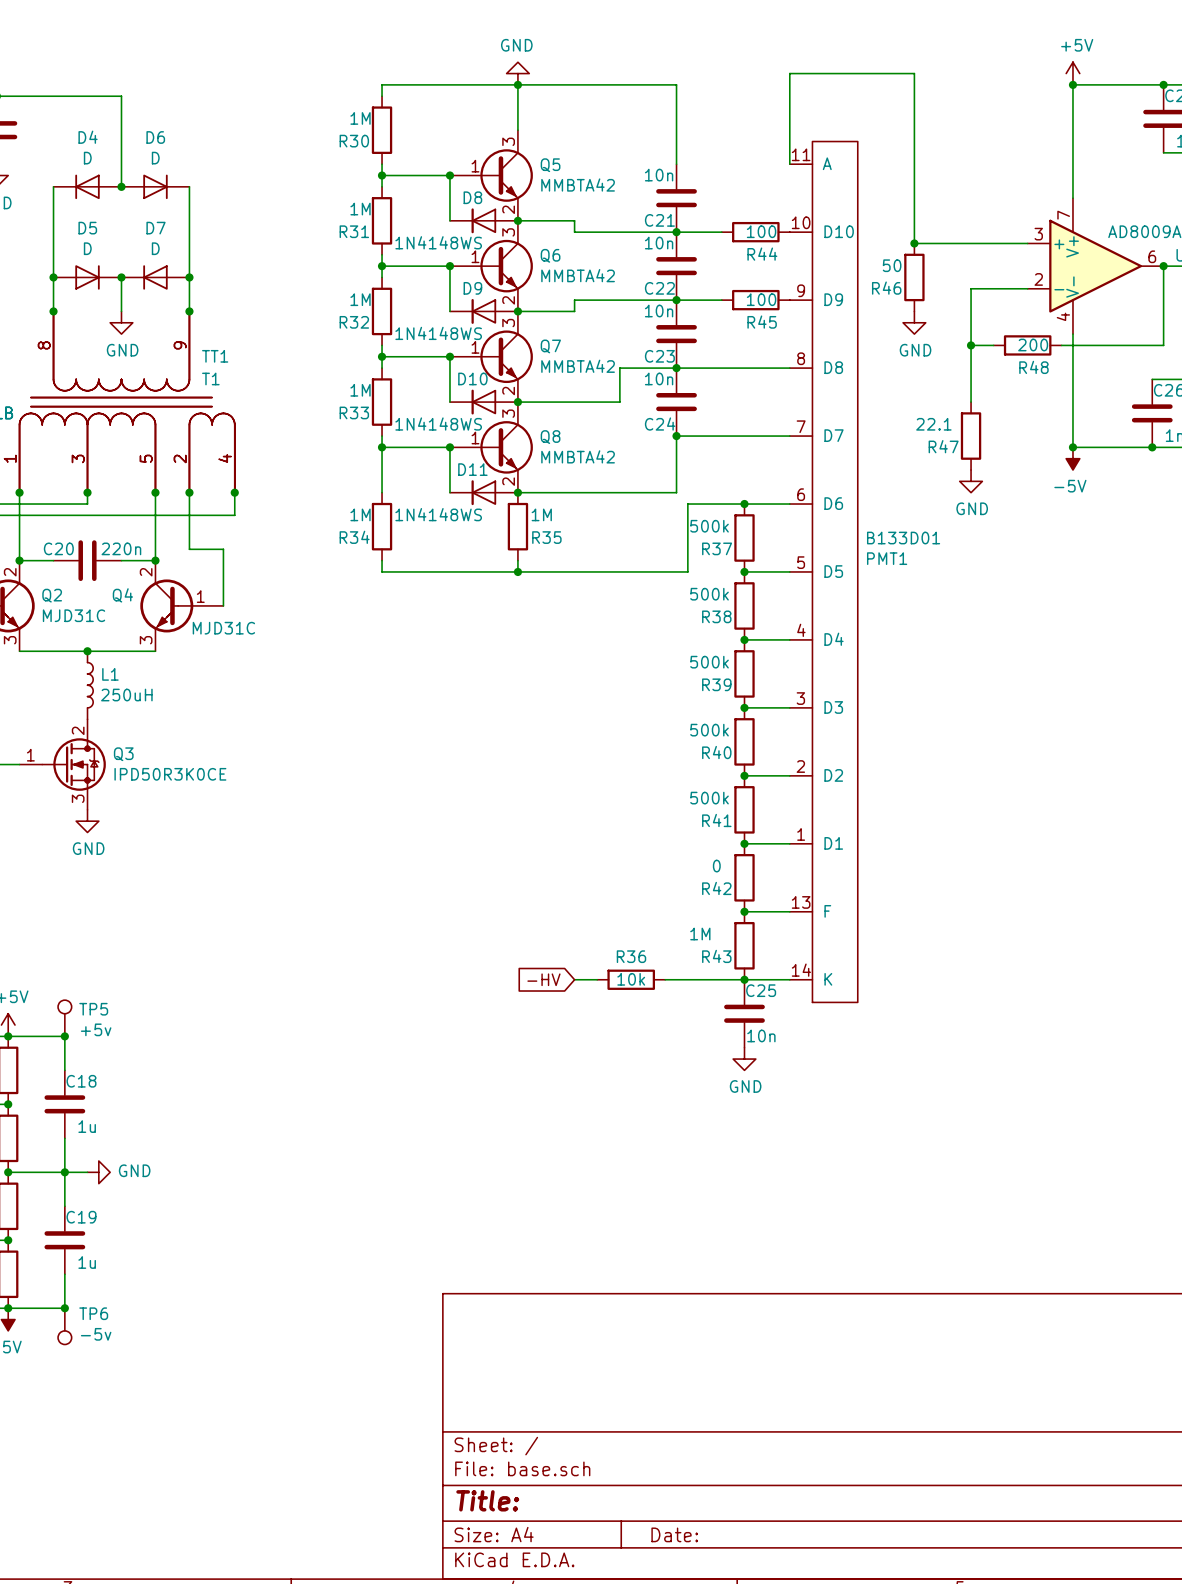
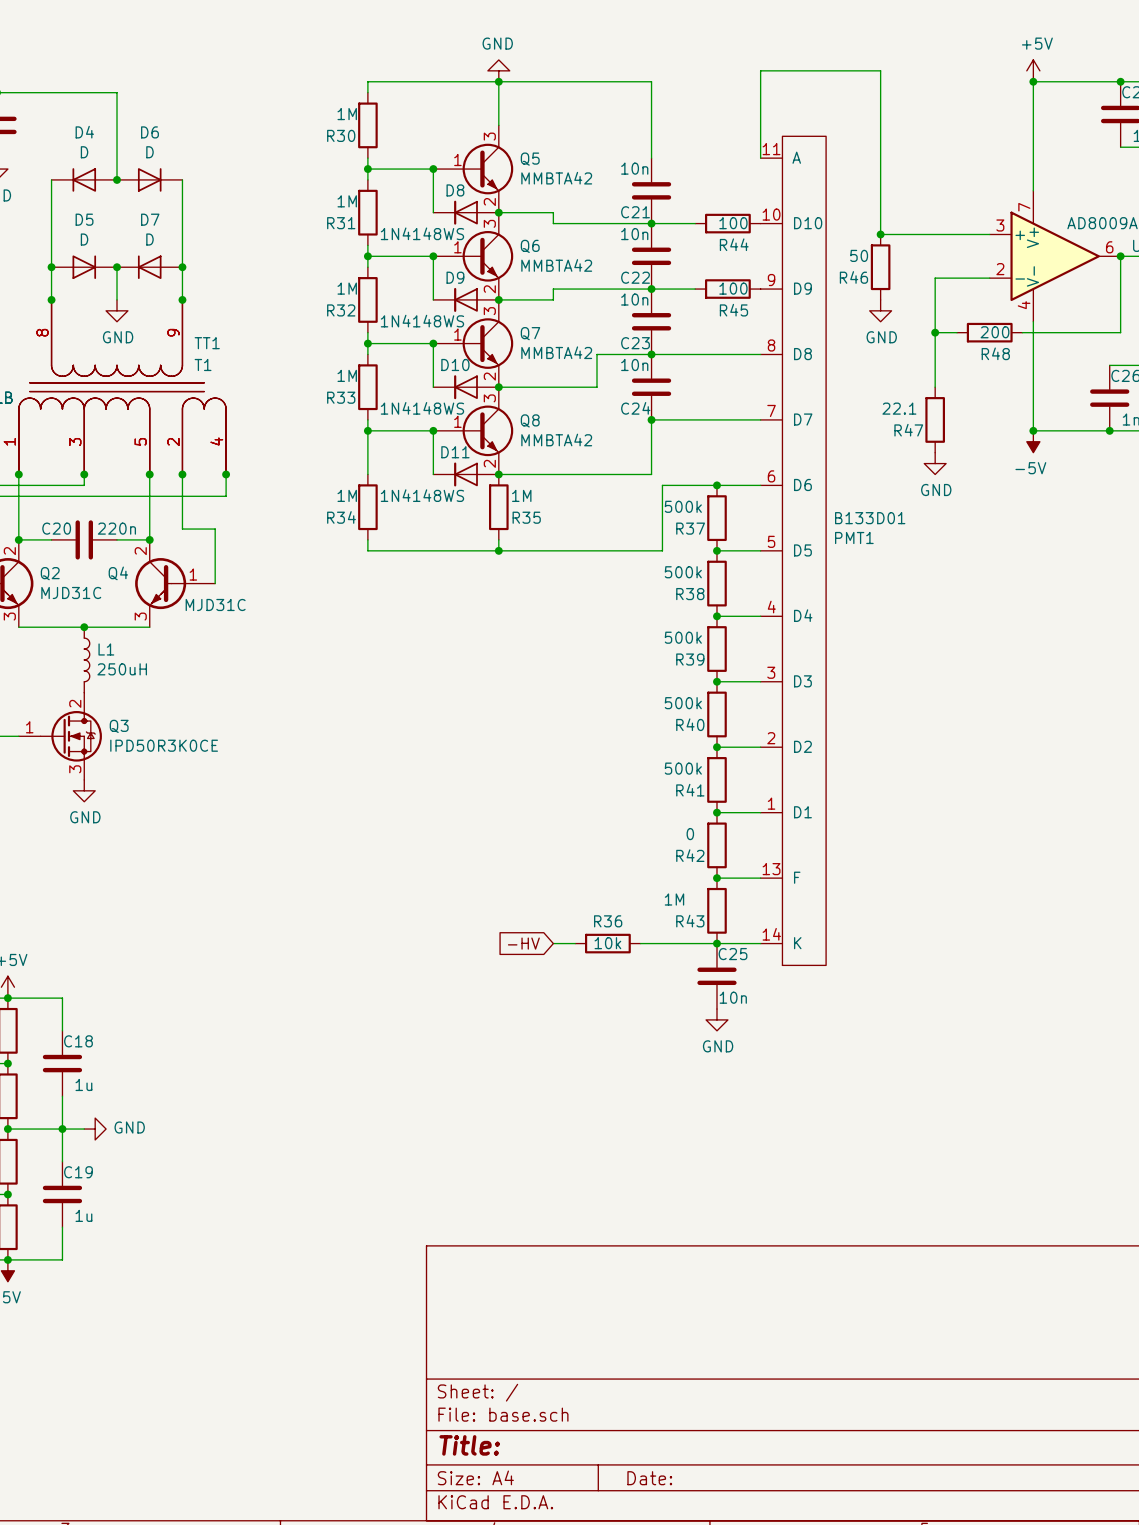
TP5: +5v (64, 1018) -> none
junction: (64, 1036) -> none
junction: (64, 1308) -> none
TP6: -5v (64, 1326) -> none

